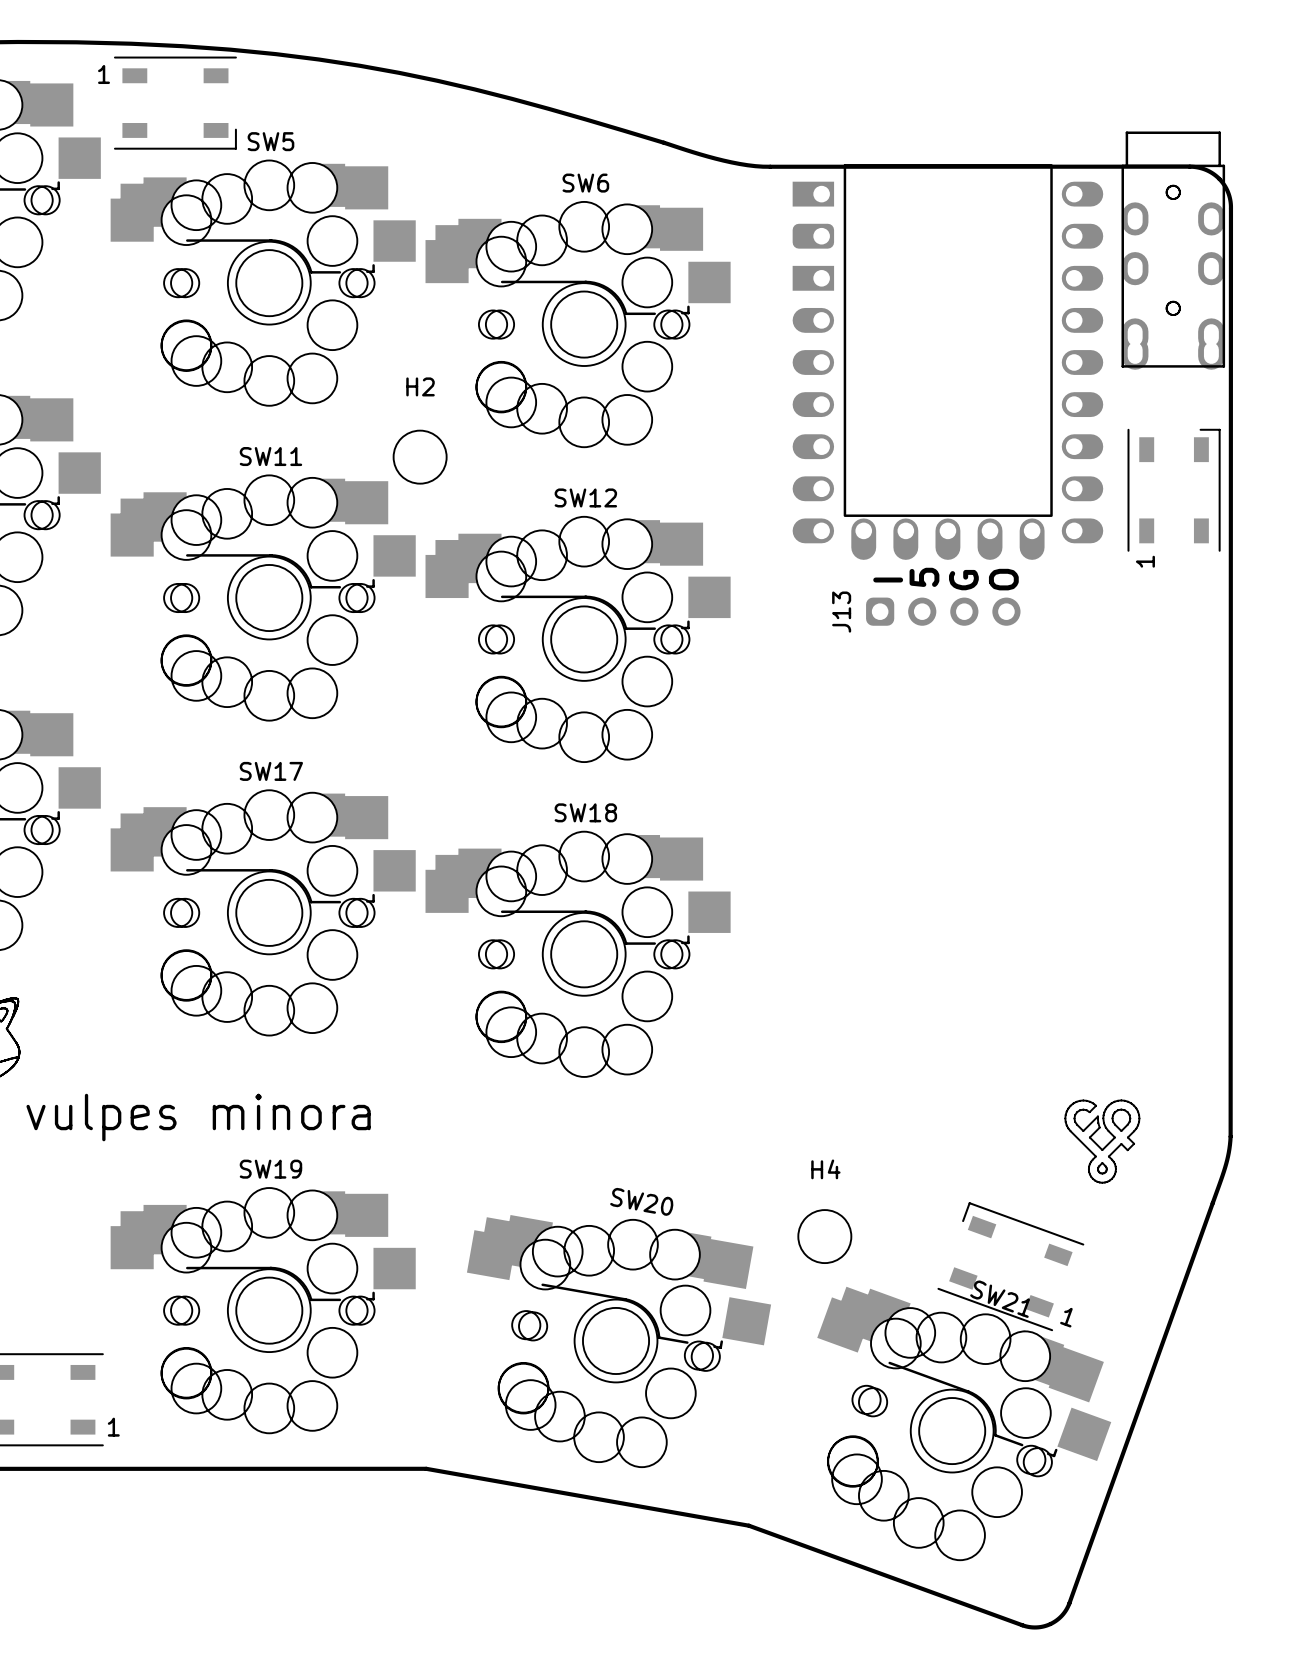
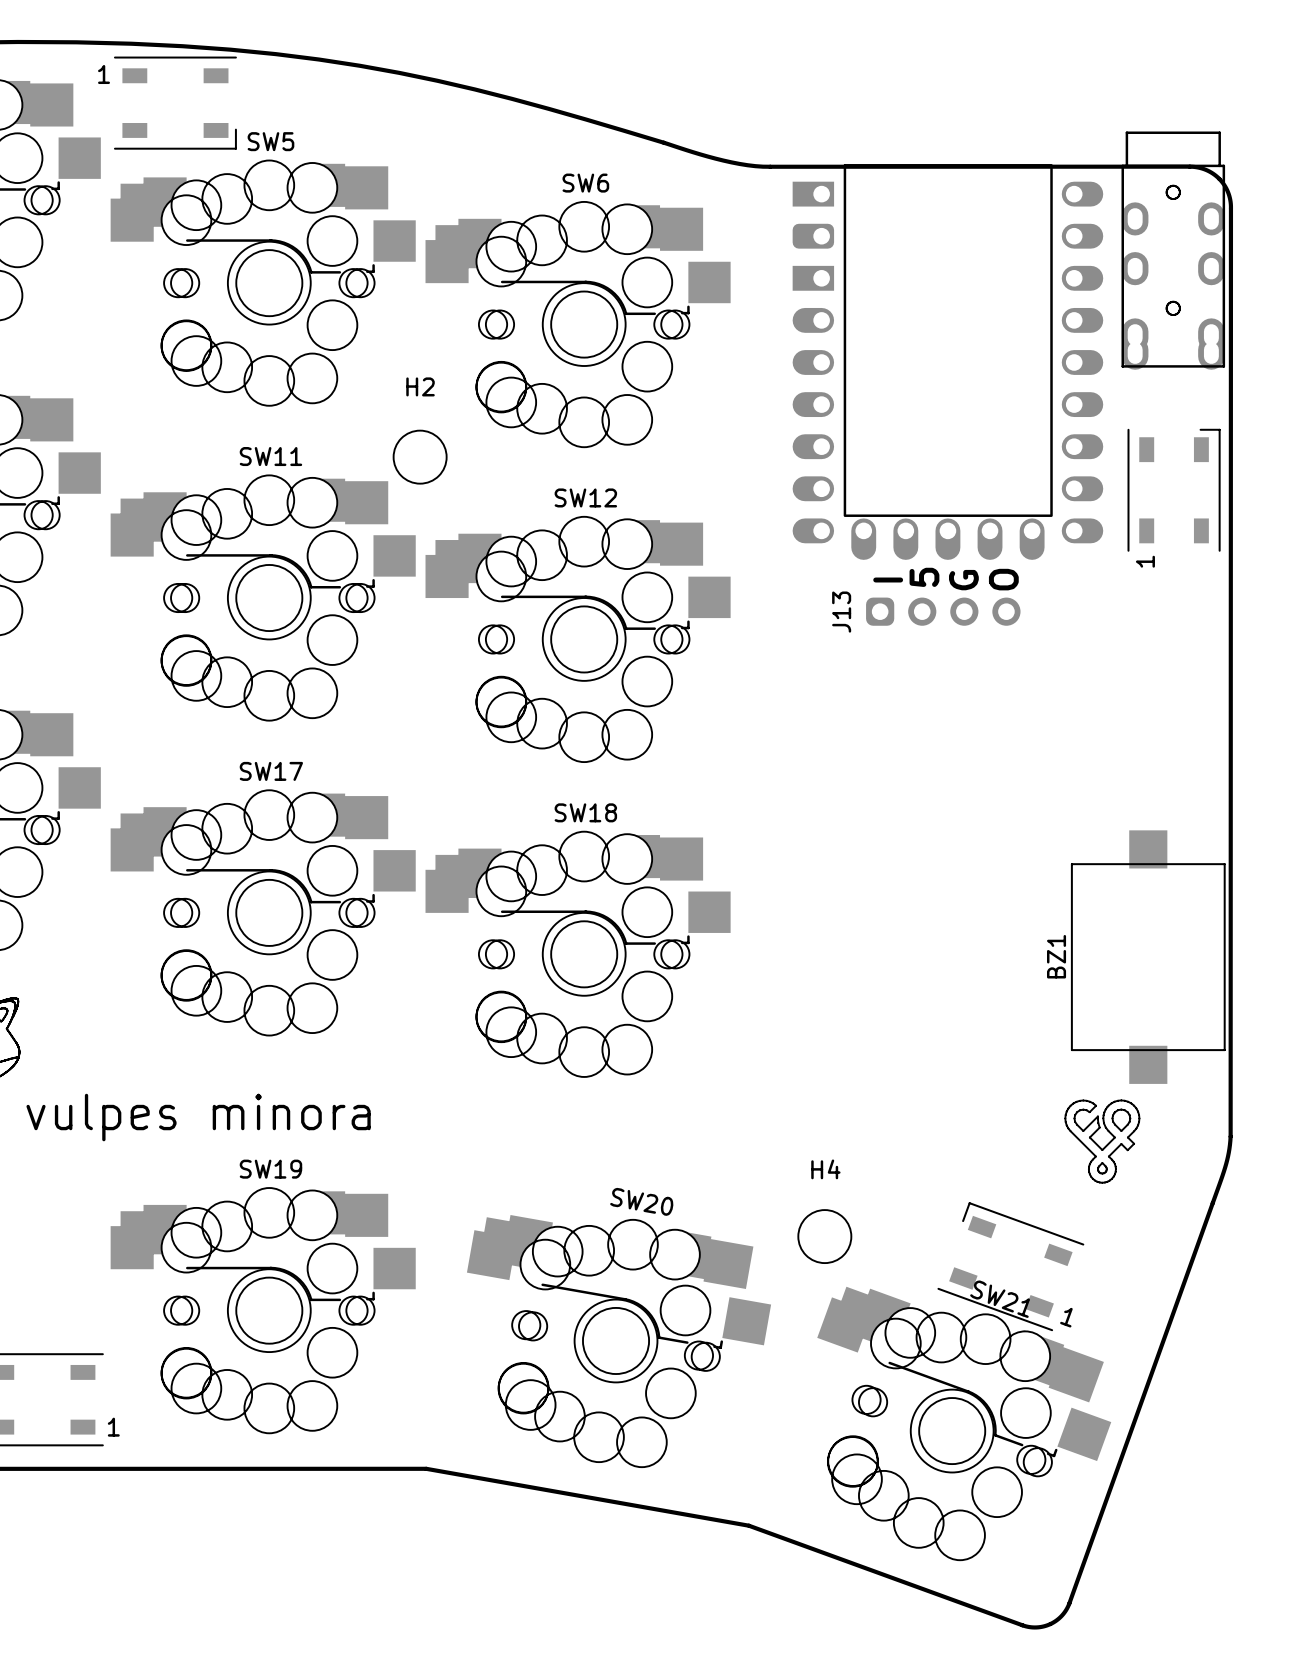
BZ1: none -> (1148, 957)

